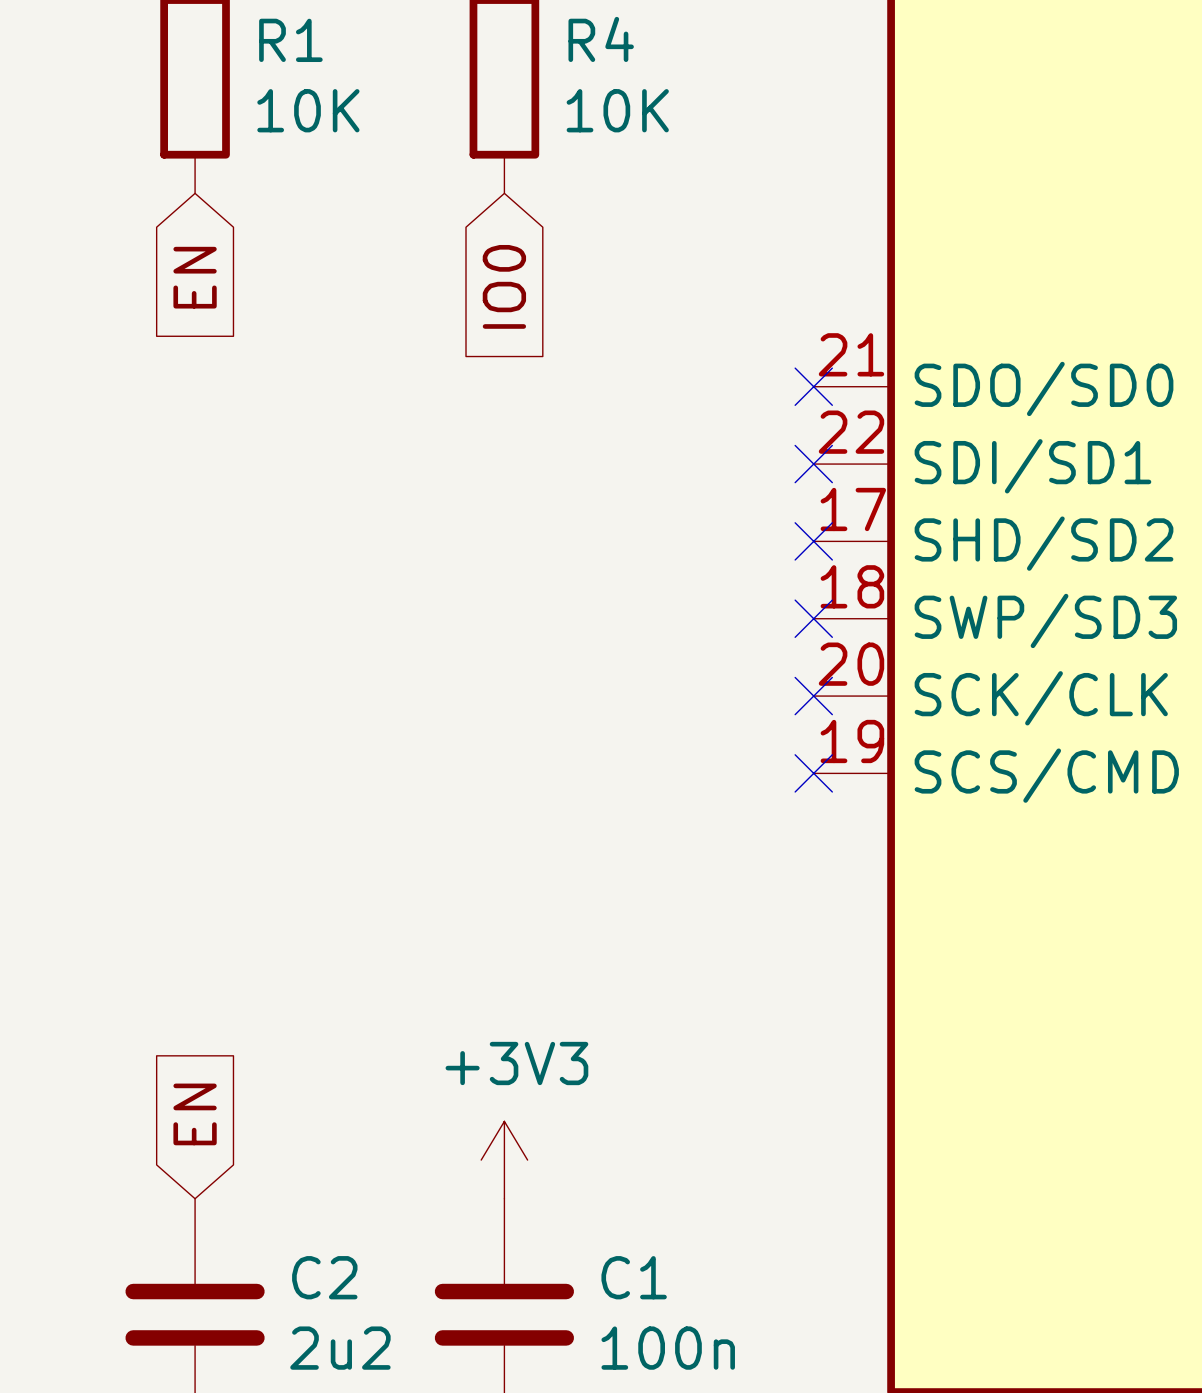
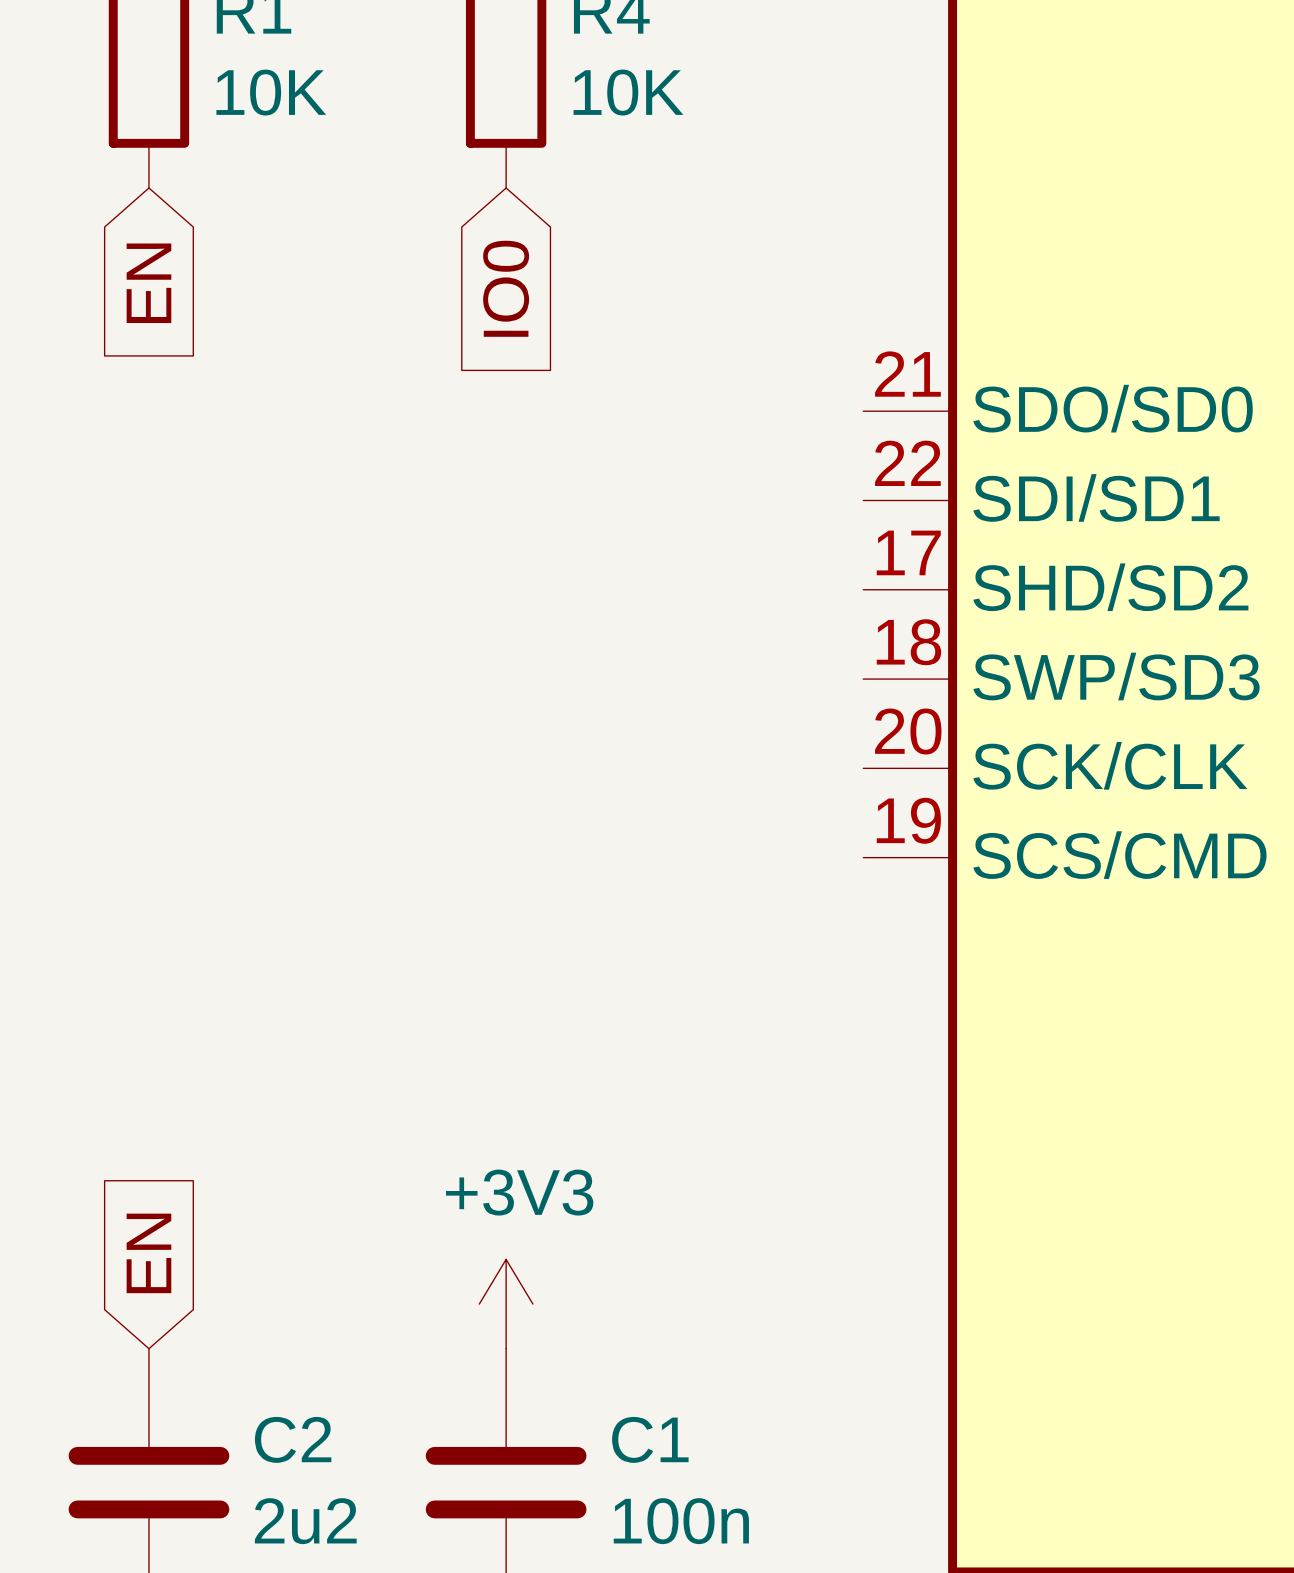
no-connect mark: (813, 386) -> none
no-connect mark: (813, 464) -> none
no-connect mark: (813, 541) -> none
no-connect mark: (813, 618) -> none
no-connect mark: (813, 696) -> none
no-connect mark: (813, 773) -> none

